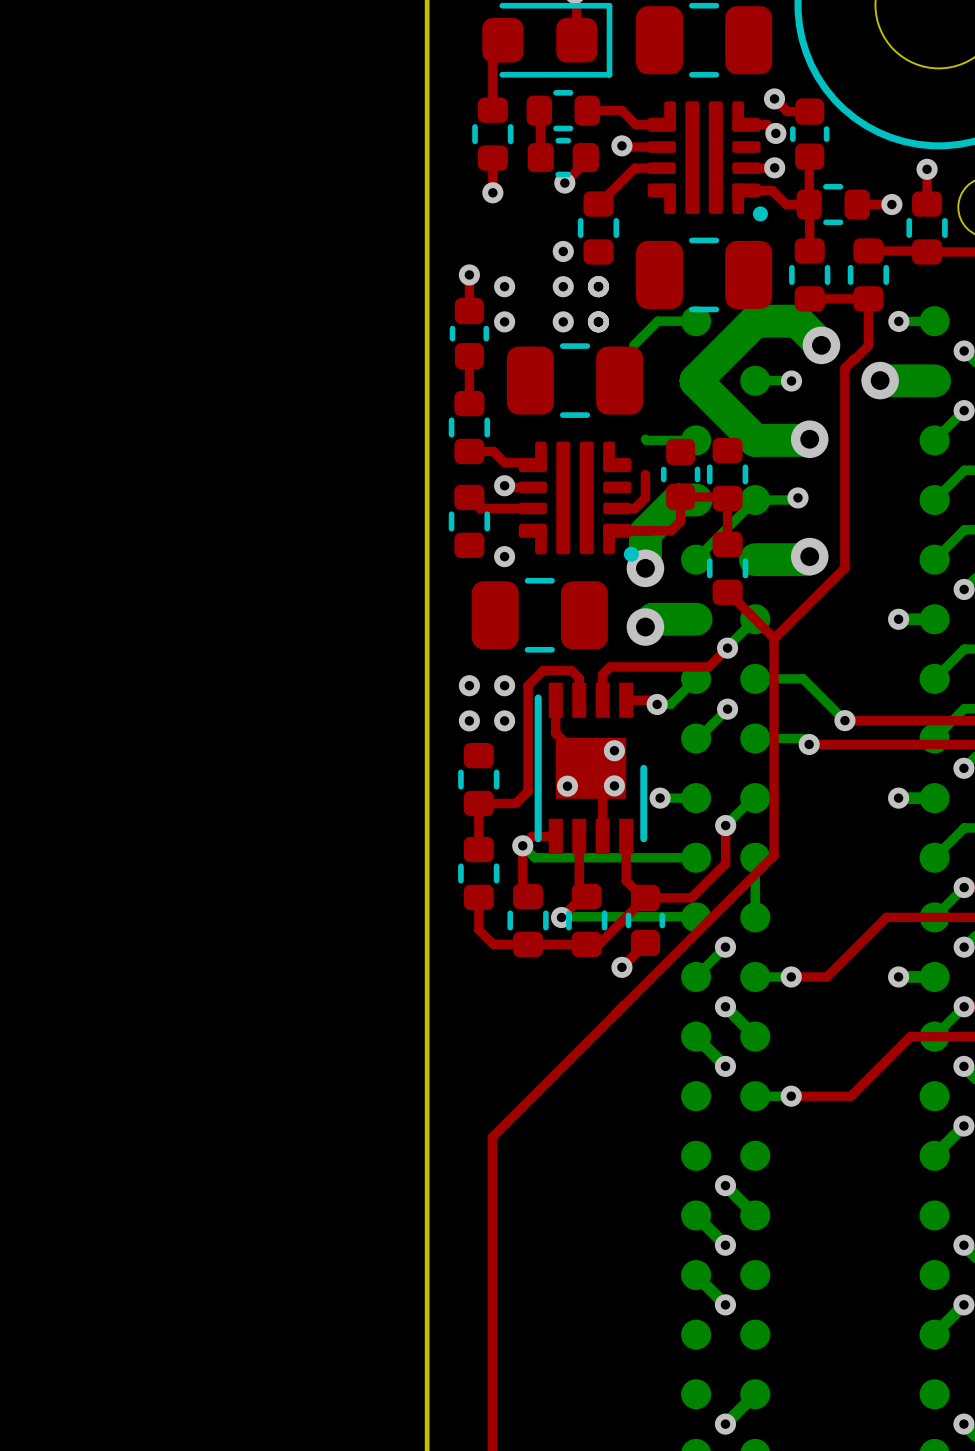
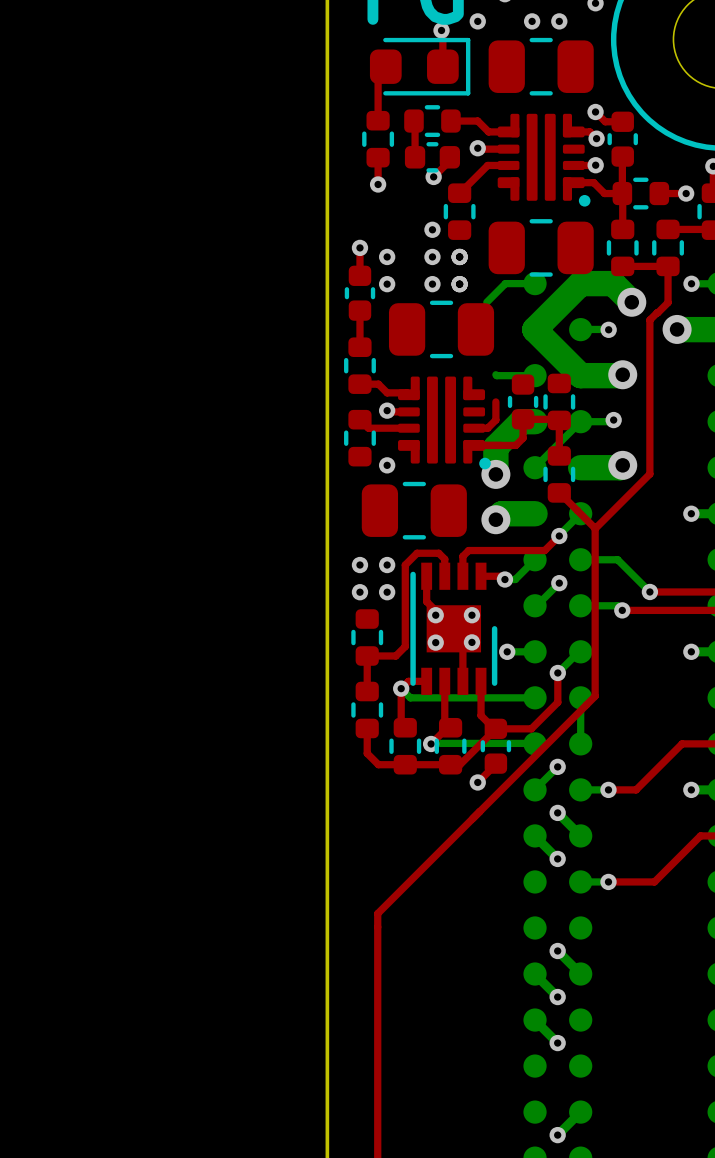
via: none -> (435, 615)

